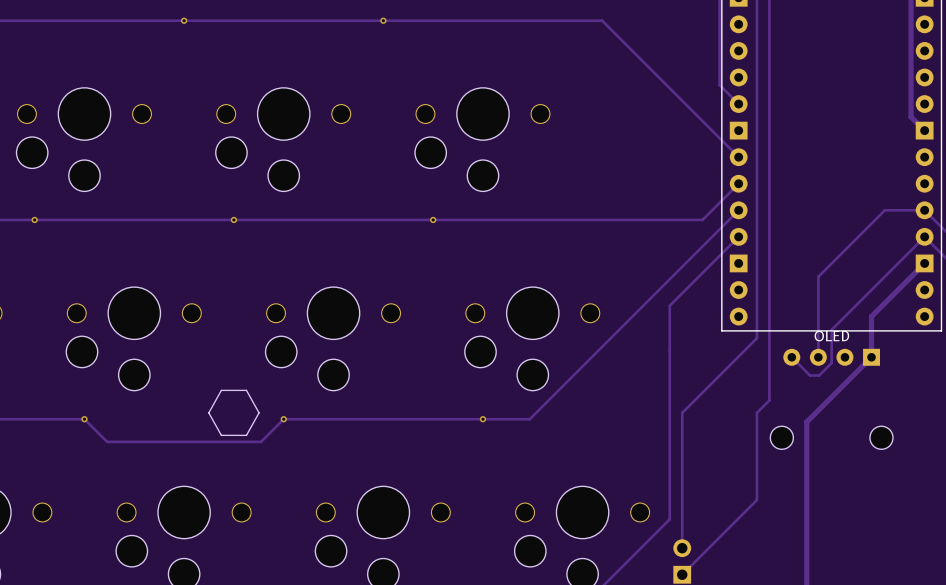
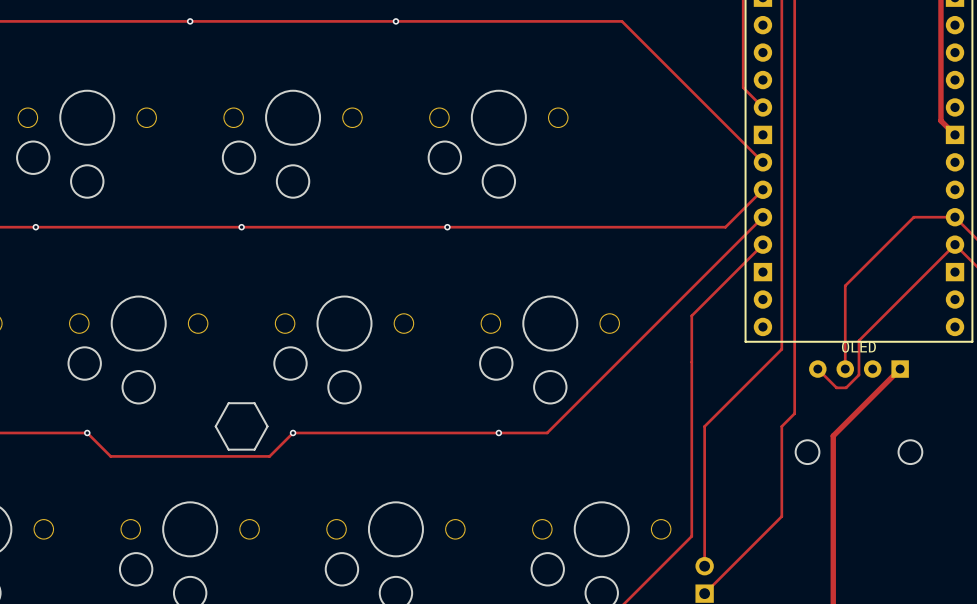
track: (924, 263) (871, 316) (871, 357) -> none

